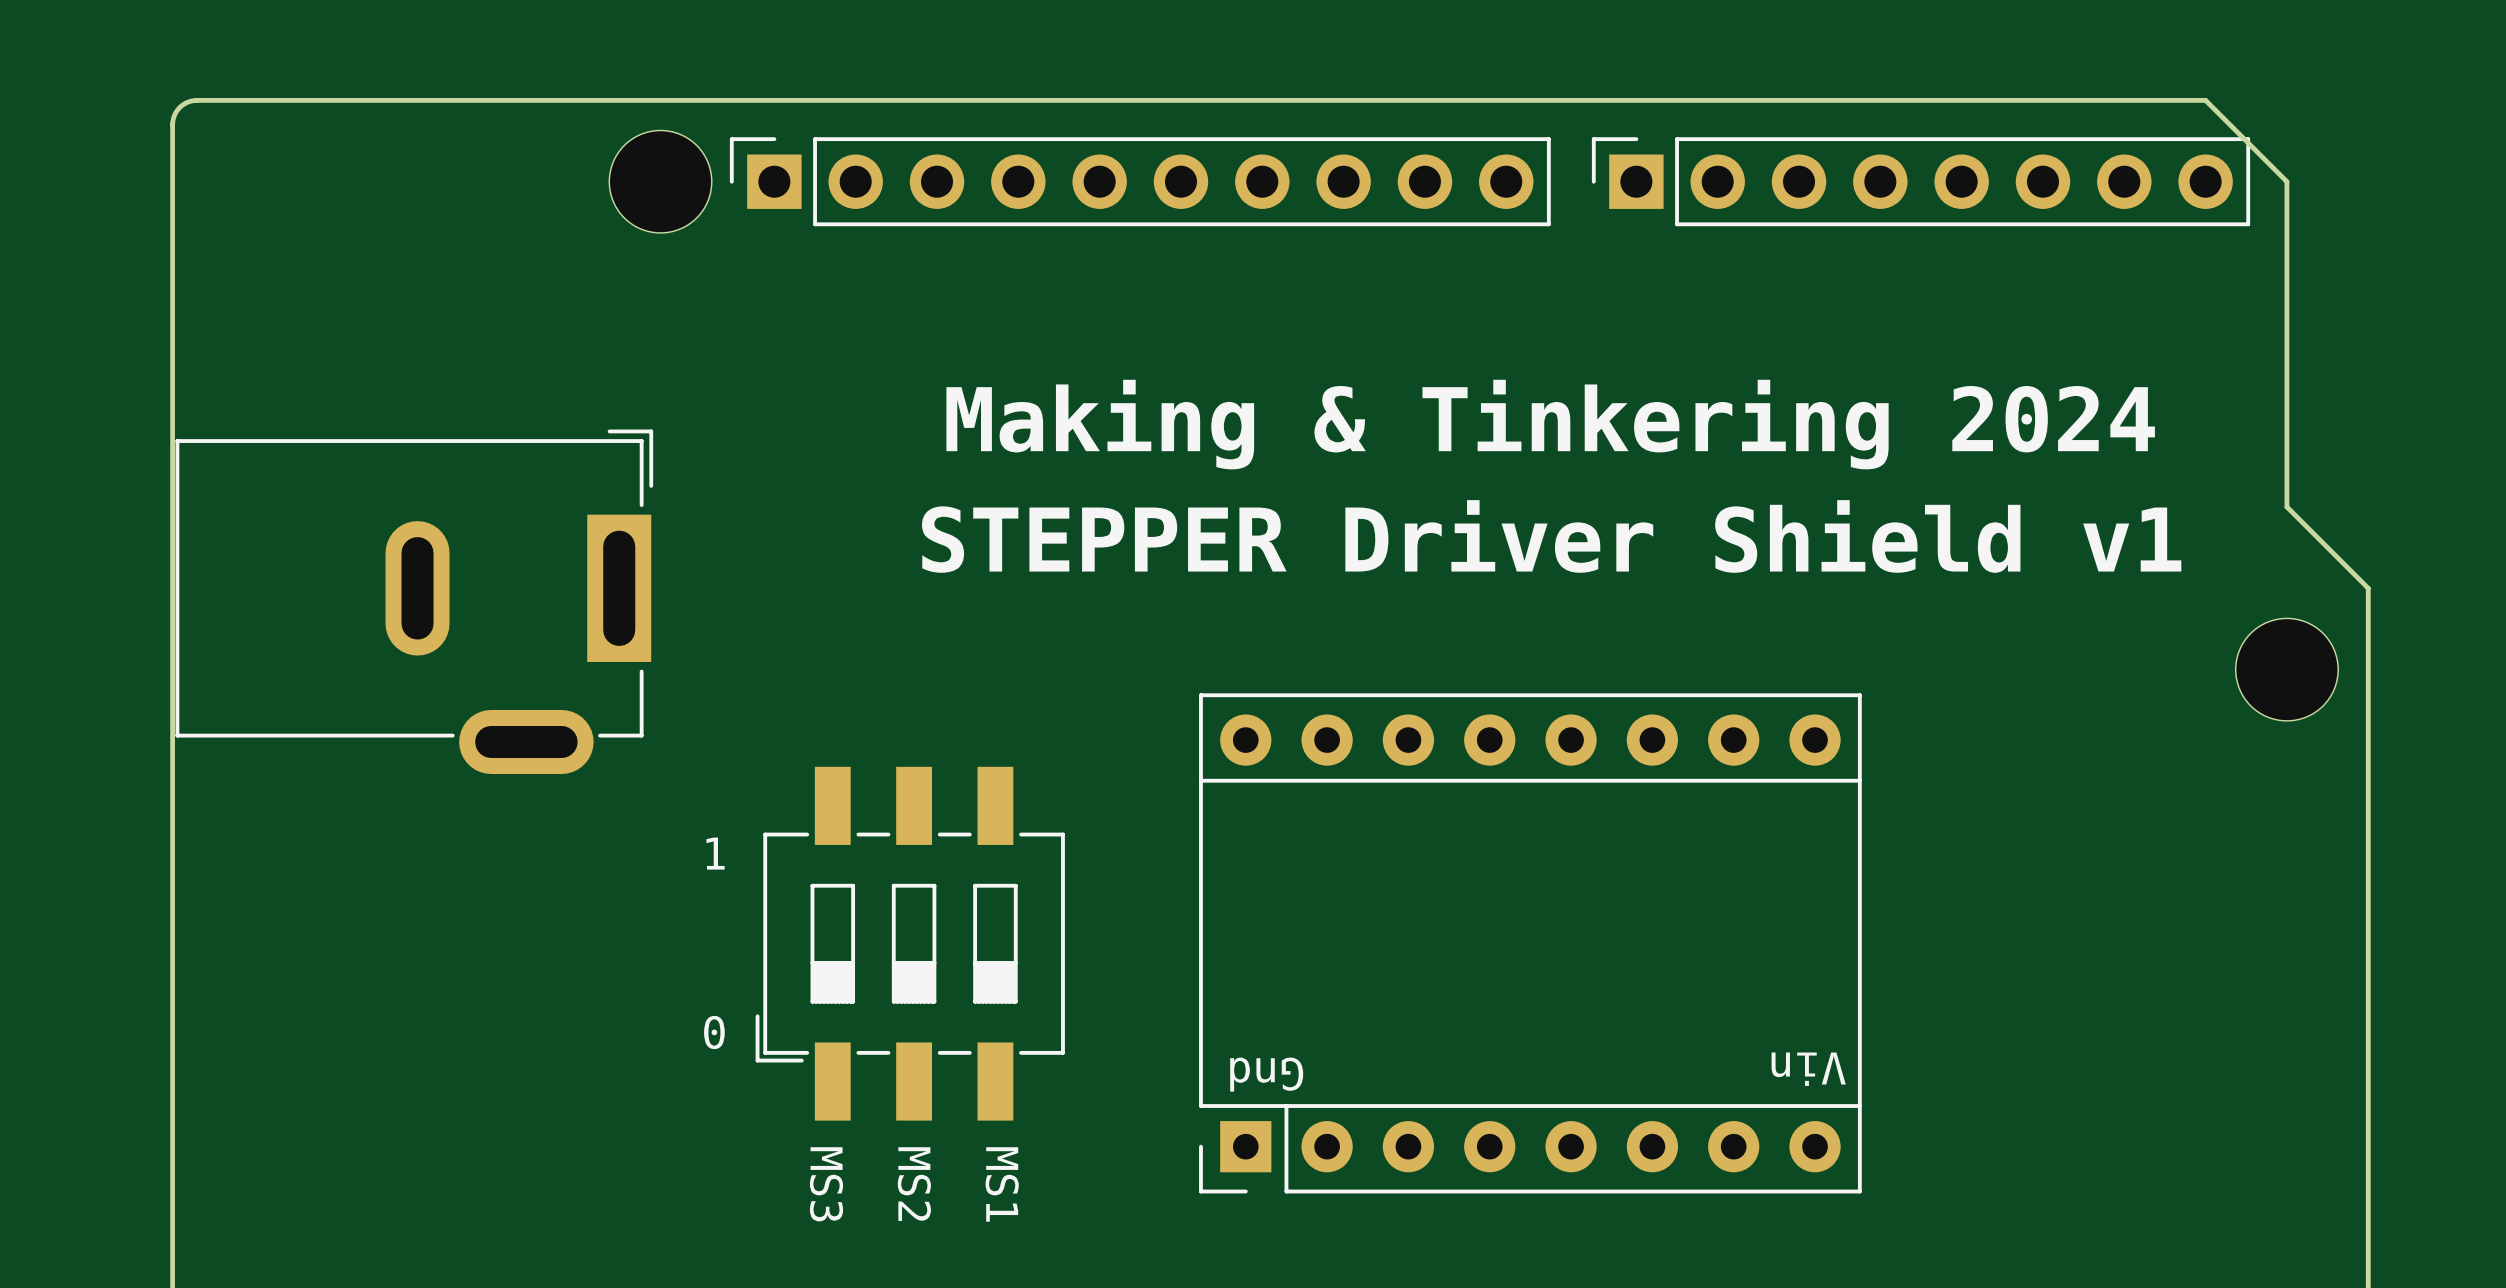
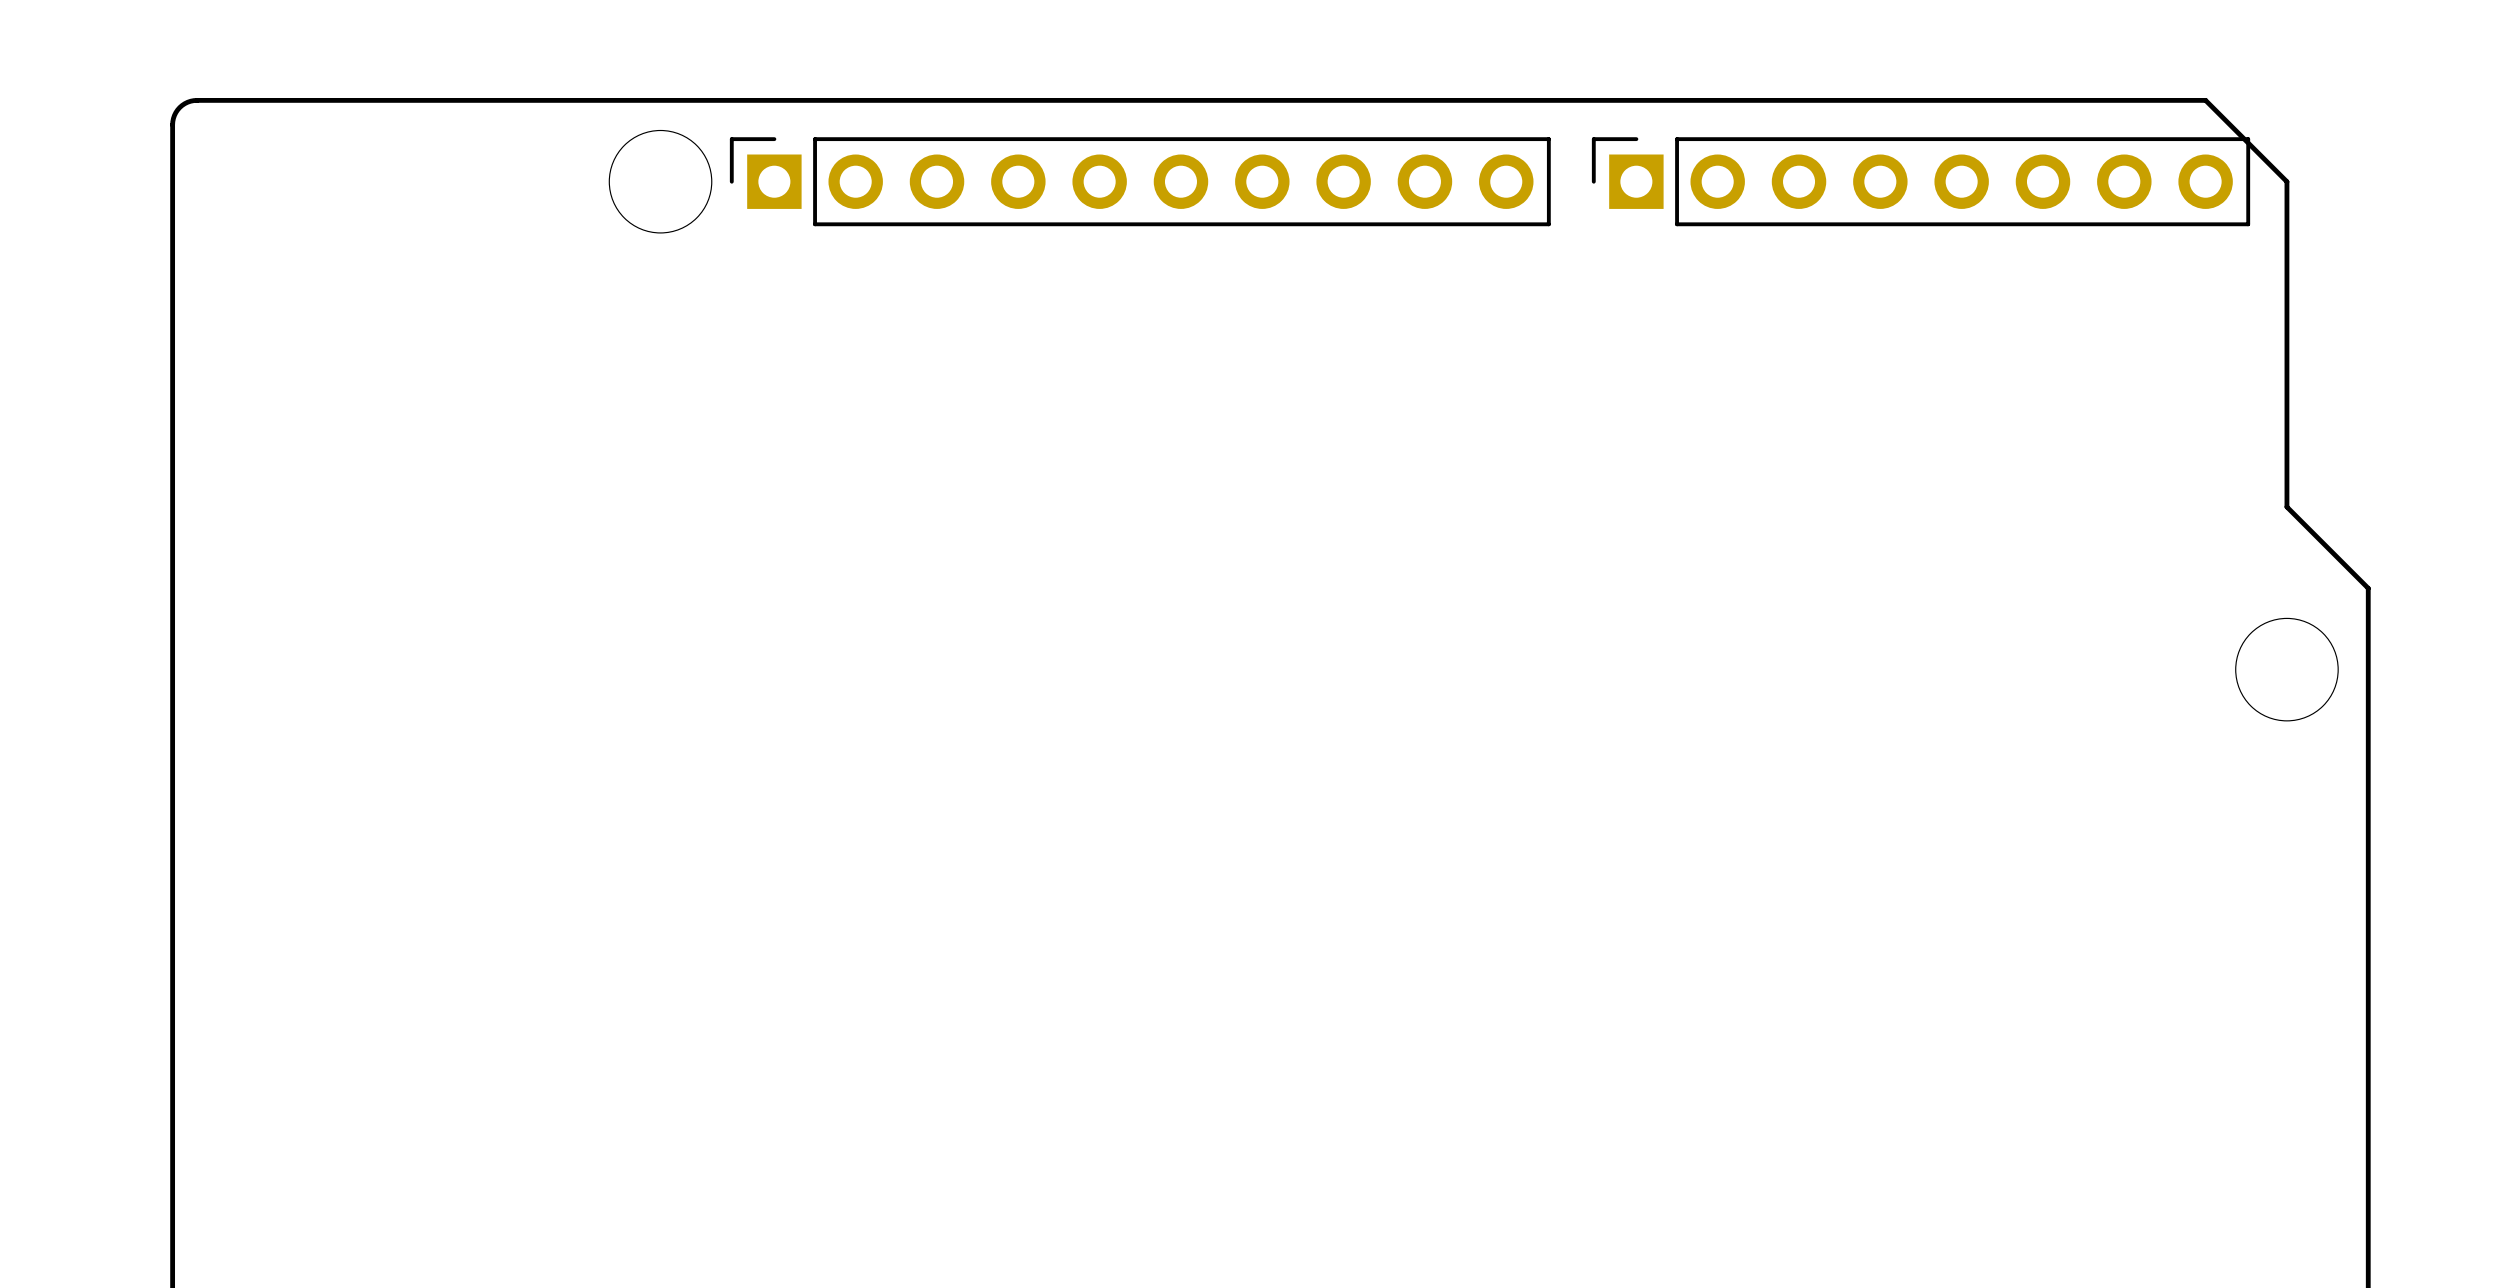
text: Making & Tinkering 2024 (1550, 424) -> none
text: STEPPER Driver Shield v1 (1551, 536) -> none
part: (414, 601) -> none
text: 1 (715, 853) -> none
part: (910, 943) -> none
part: (1530, 943) -> none
text: 0 (714, 1032) -> none
text: Vin (1808, 1069) -> none
text: Gnd (1266, 1074) -> none
text: MS3 (826, 1184) -> none
text: MS2 (914, 1184) -> none
text: MS1 (1002, 1184) -> none

